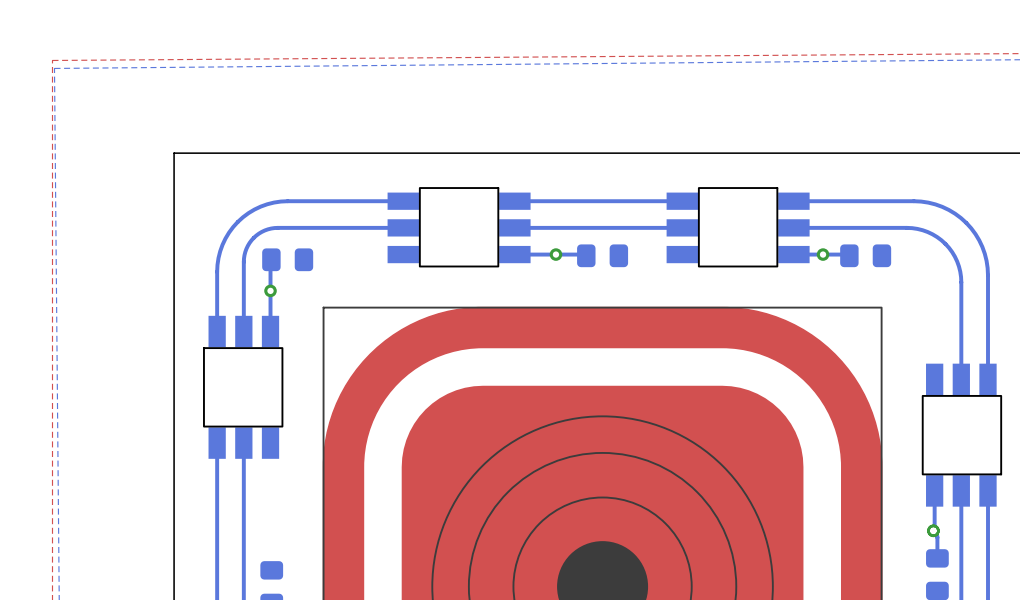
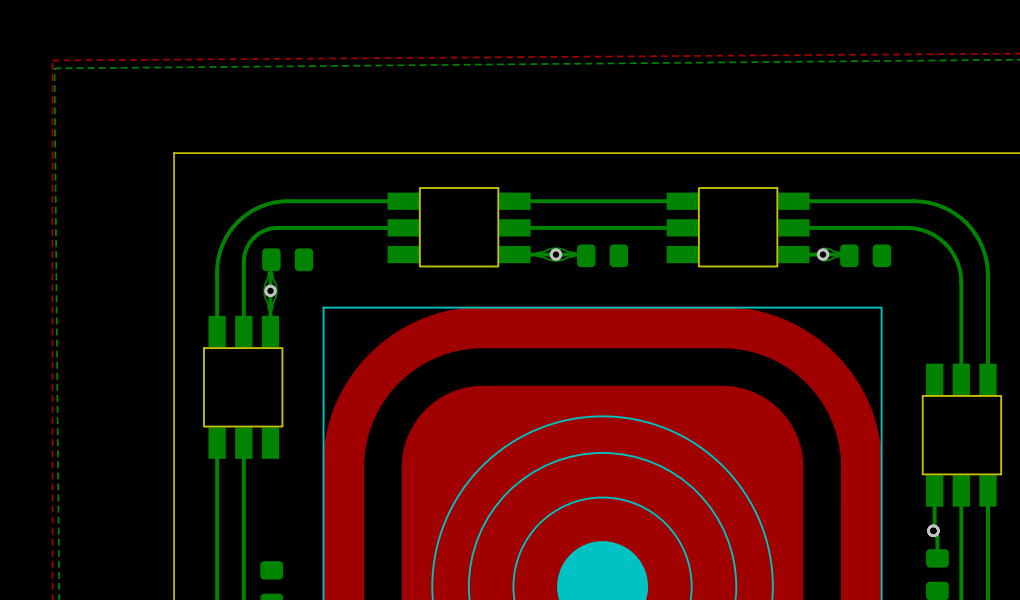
bottom zone outline: none -> (555, 248) (574, 252) (574, 256) (555, 260)
bottom zone outline: none -> (555, 248) (537, 252) (537, 256) (555, 260)
bottom zone outline: none -> (823, 248) (841, 252) (841, 256) (823, 260)
bottom zone outline: none -> (264, 290) (268, 272) (272, 272) (276, 290)
bottom zone outline: none -> (264, 290) (268, 309) (272, 309) (276, 290)

